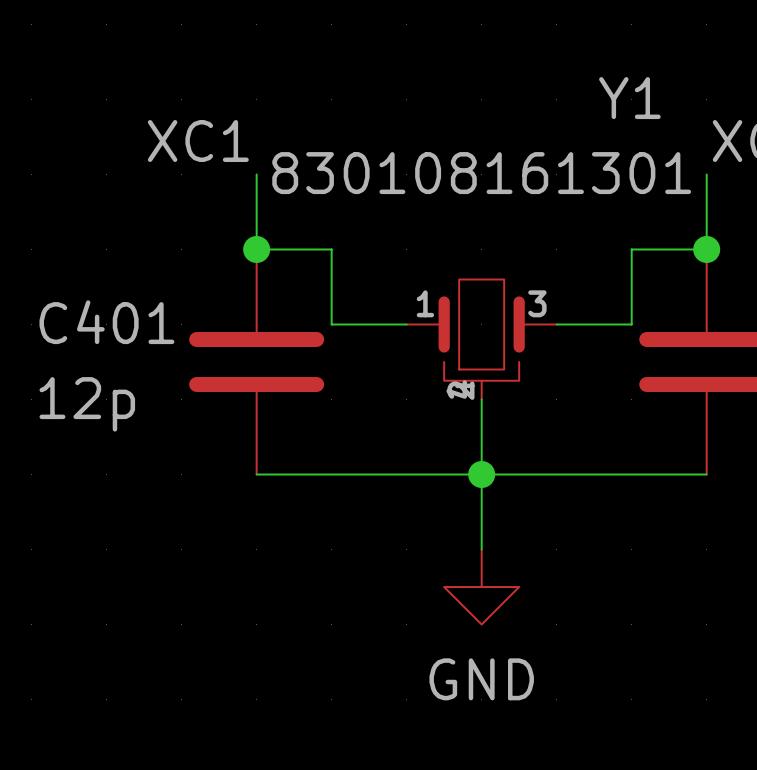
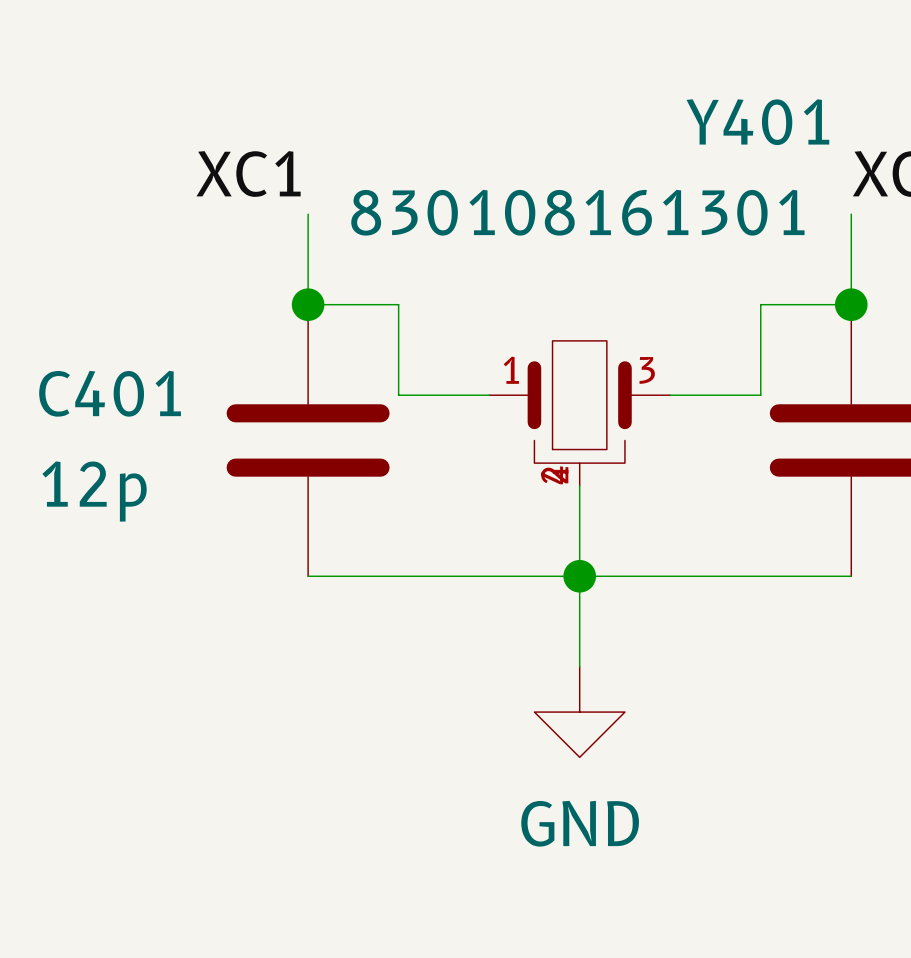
Y1 name: Y1 (629, 98) -> Y401 (757, 122)

